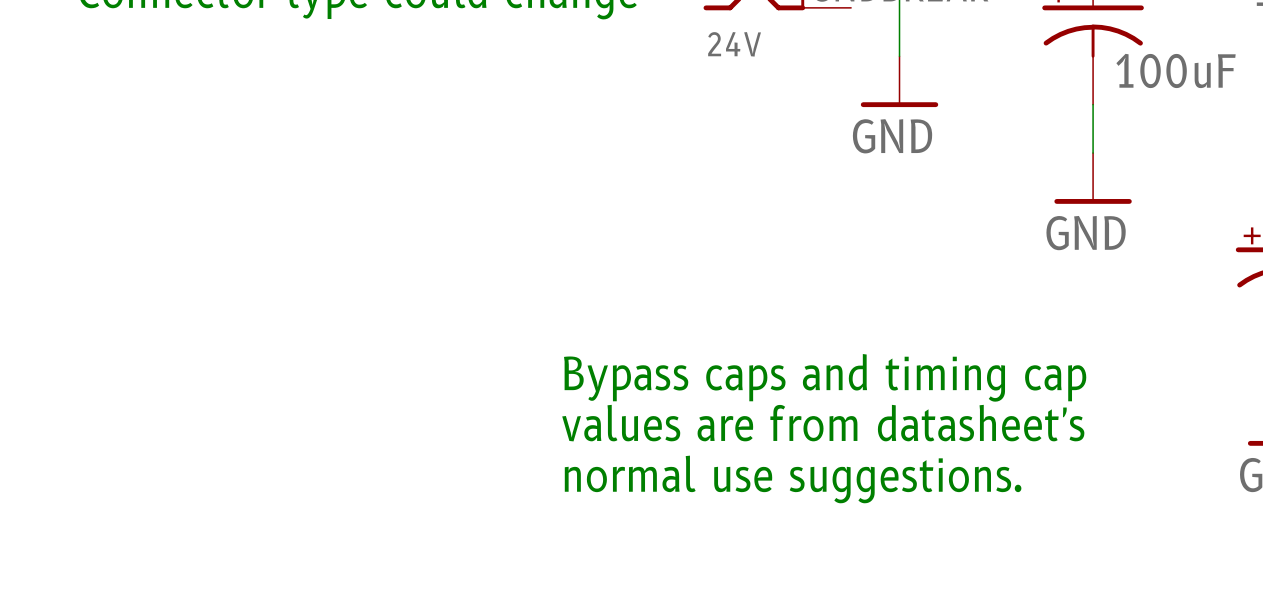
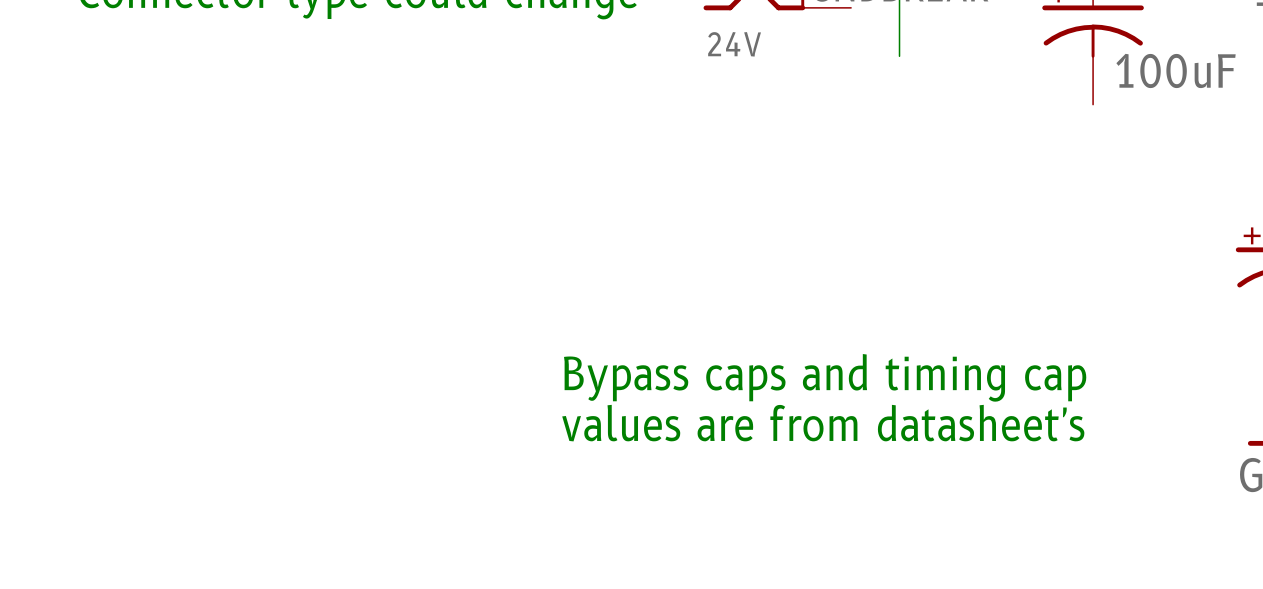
power symbol: GND (899, 81) -> none
wire: (1093, 104) (1093, 153) -> none
power symbol: GND (1093, 178) -> none
text: normal use suggestions. (793, 479) -> none

